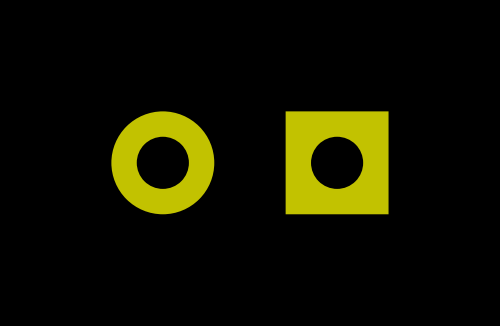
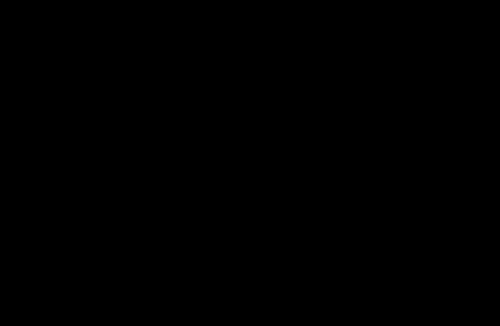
part: (249, 162) -> none

